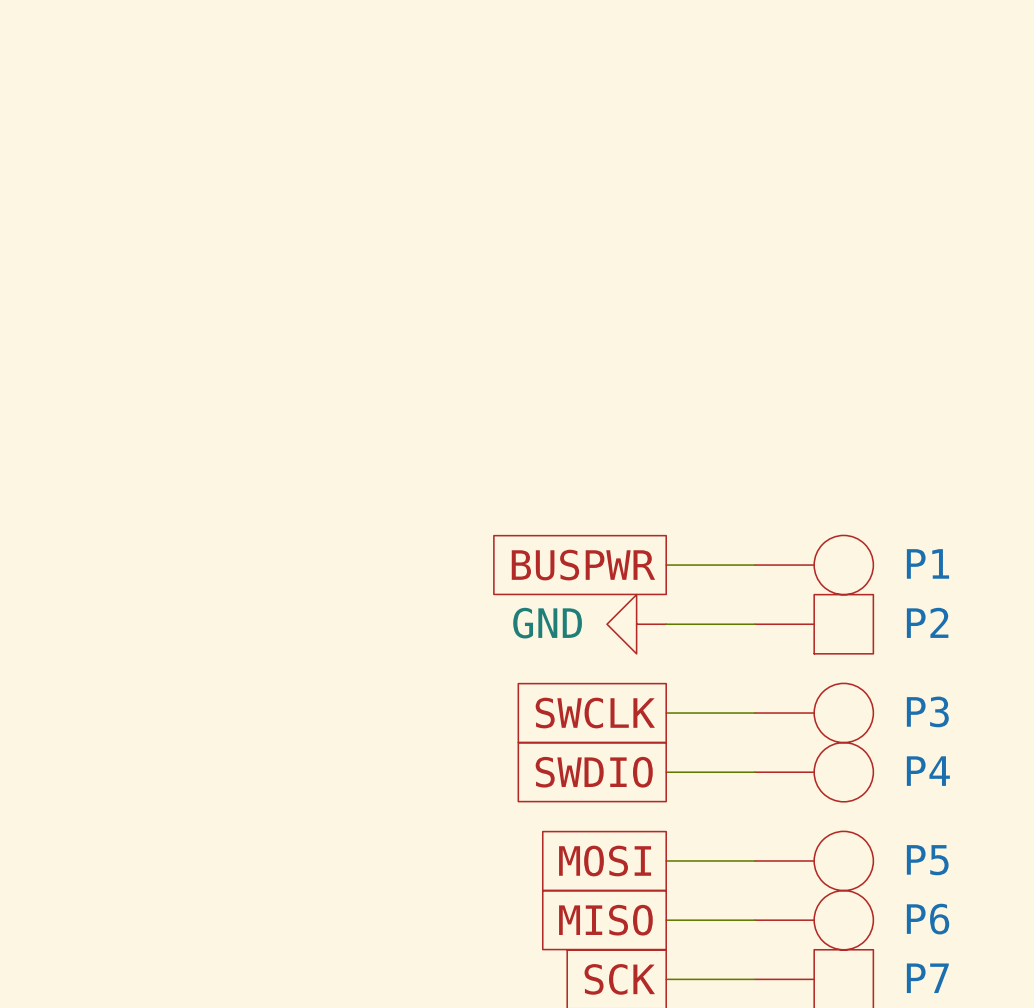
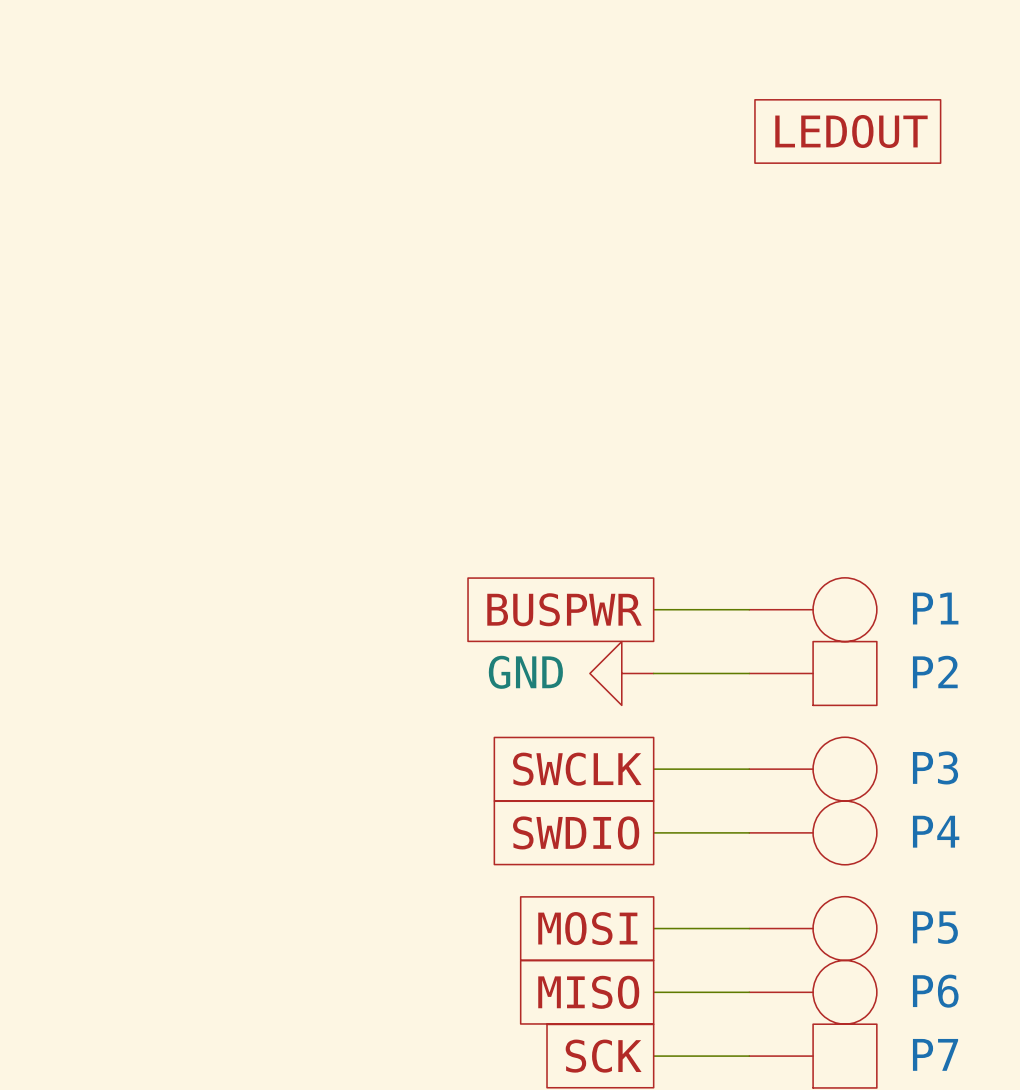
global label: none -> LEDOUT (851, 131)

